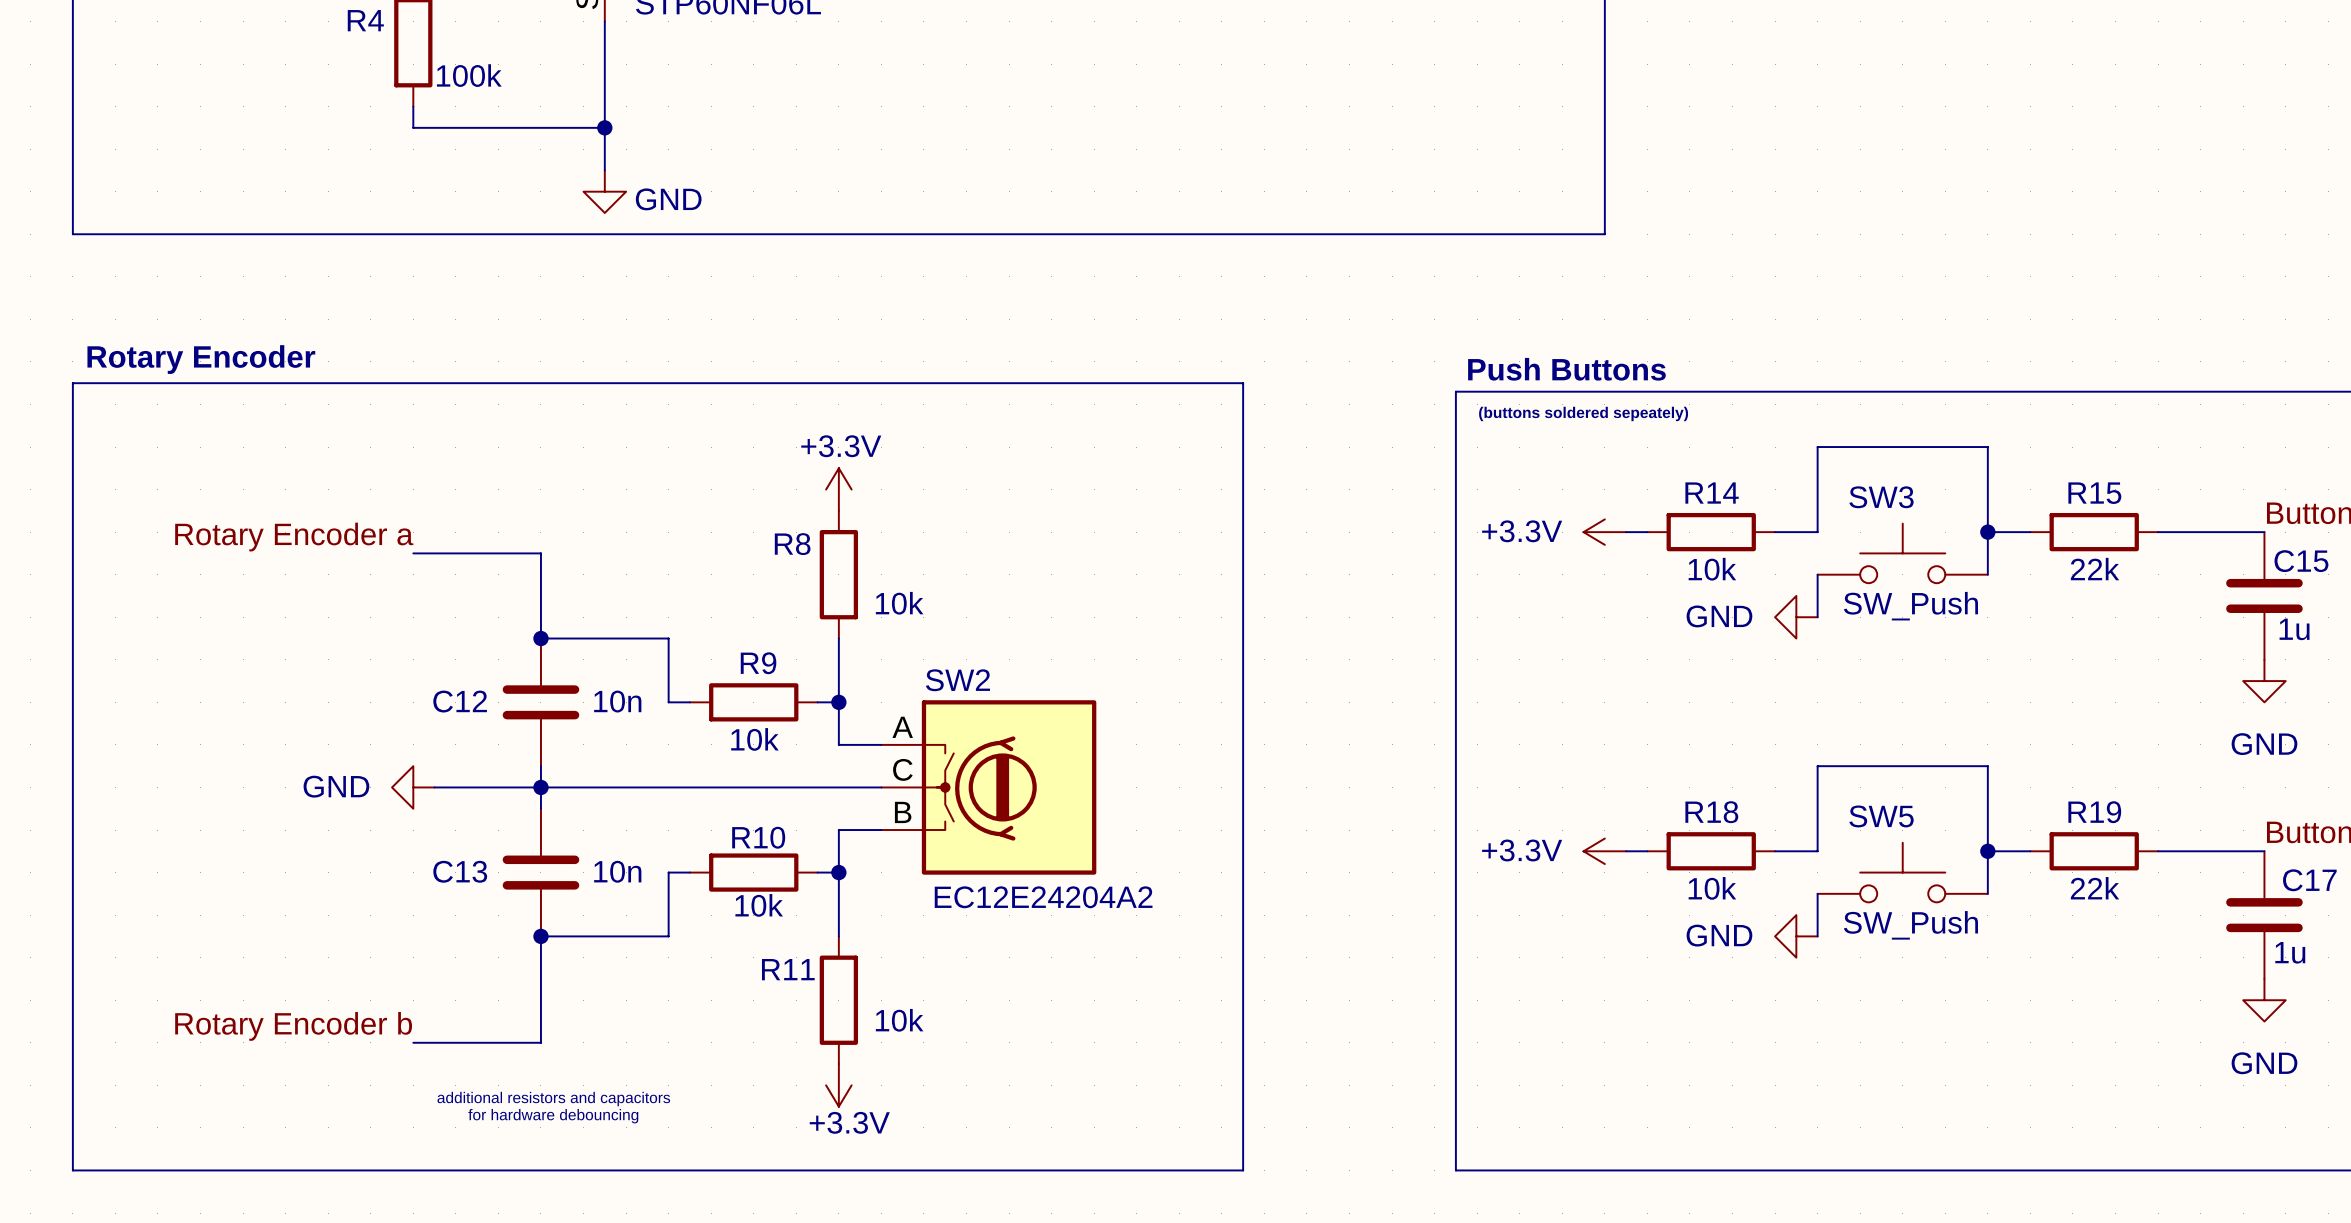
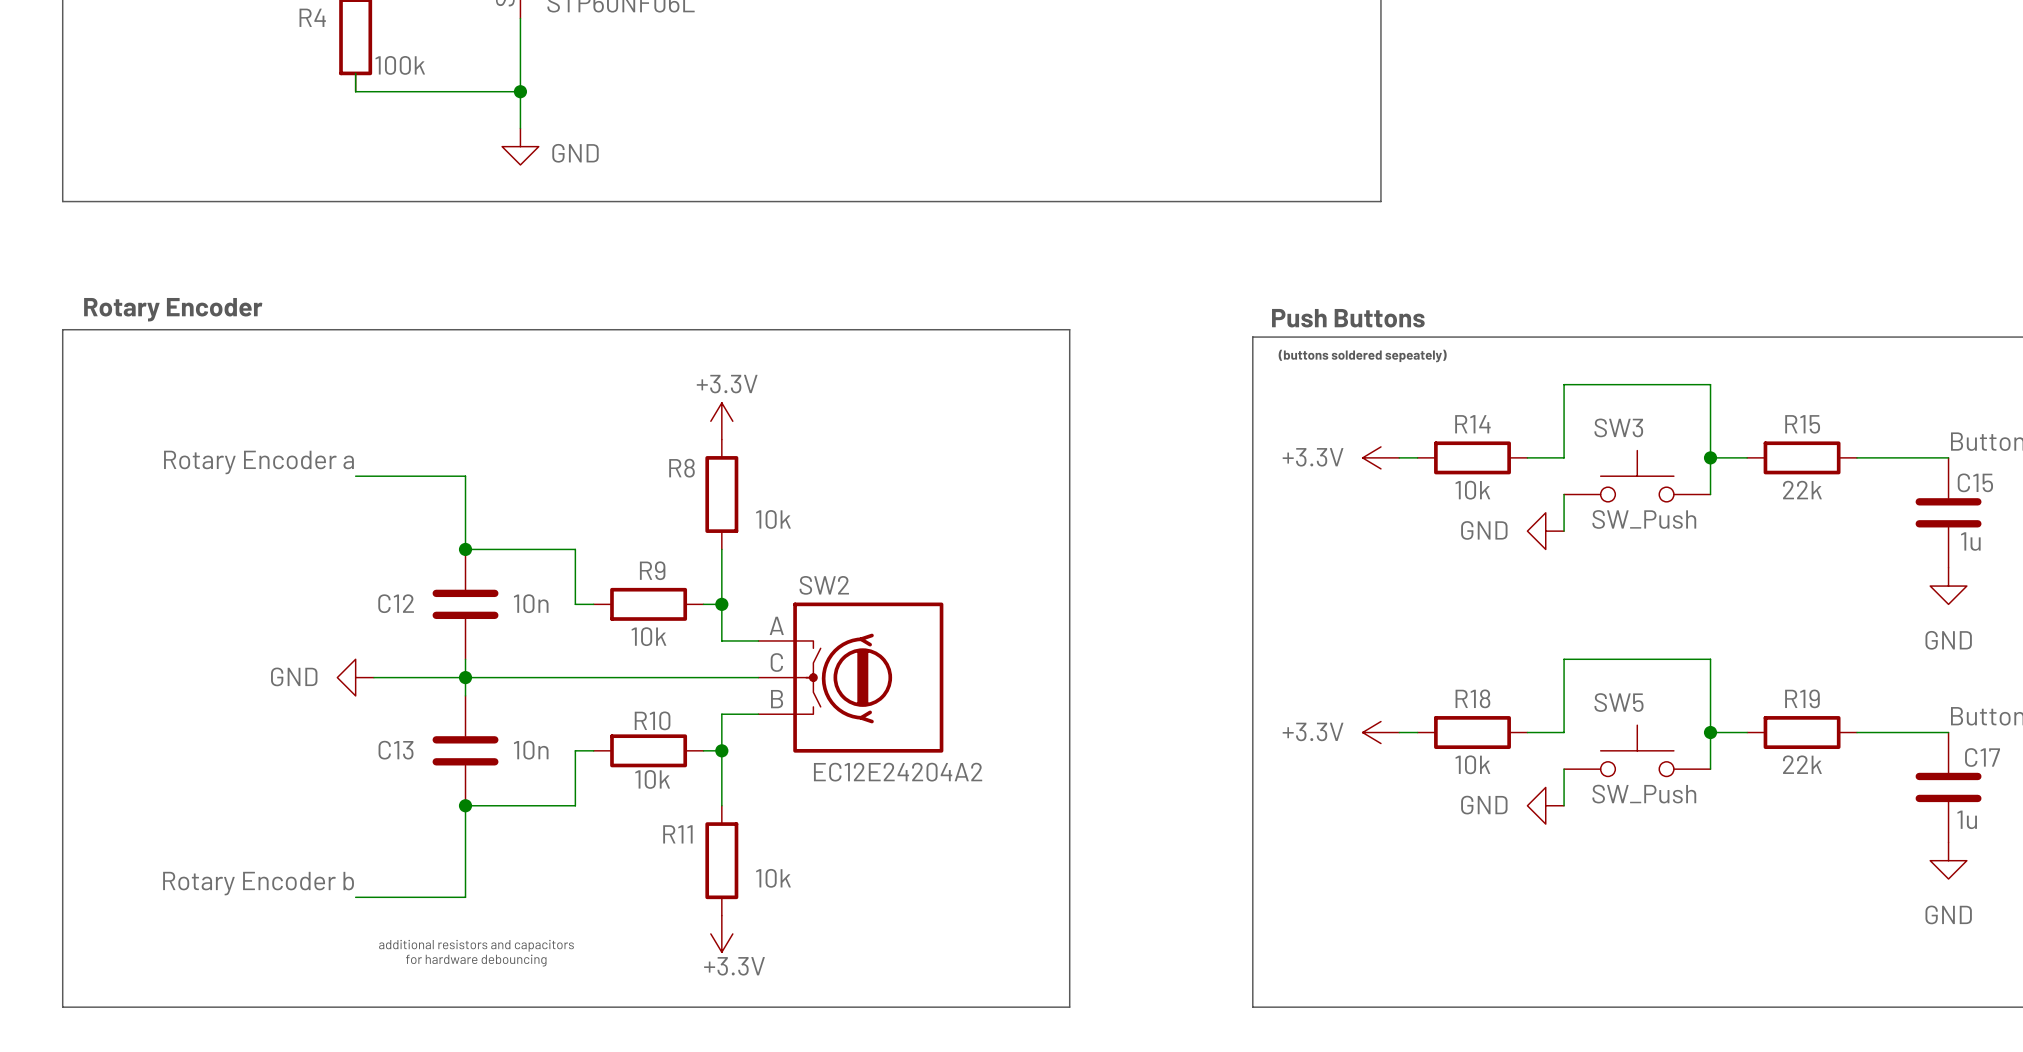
wire: (413, 106) (413, 127) (604, 127) -> (355, 73) (355, 91) (520, 91)
junction position: (604, 127) -> (520, 91)
power symbol position: GND (604, 191) -> GND (520, 146)

